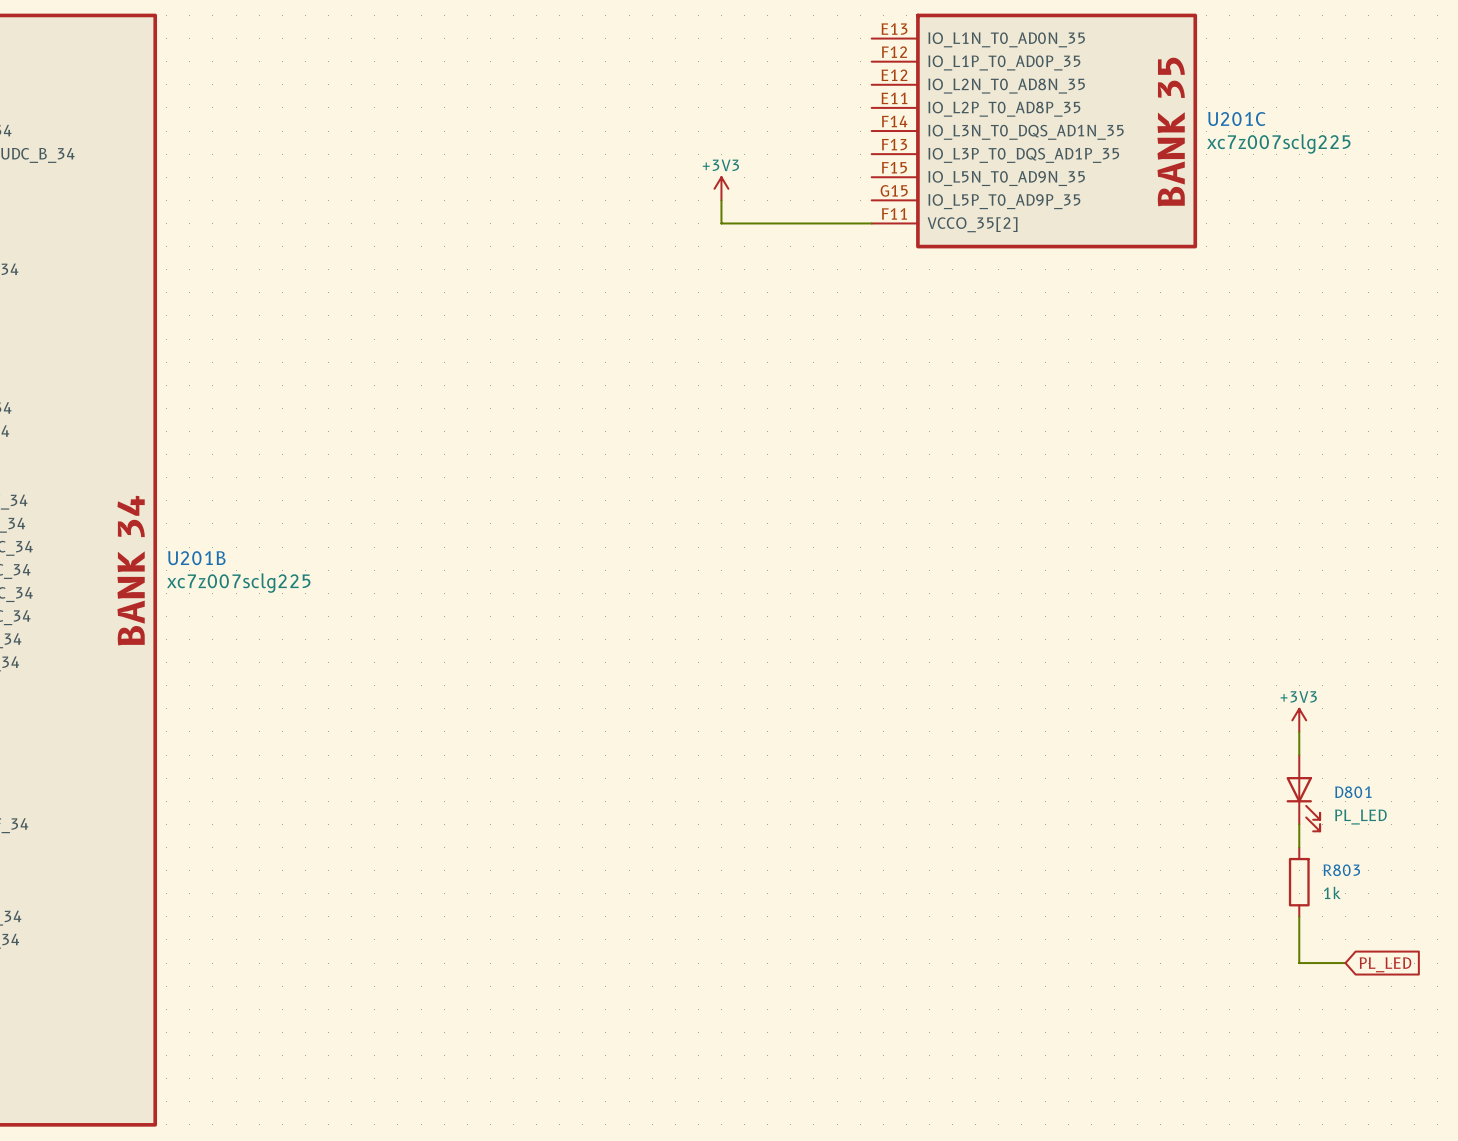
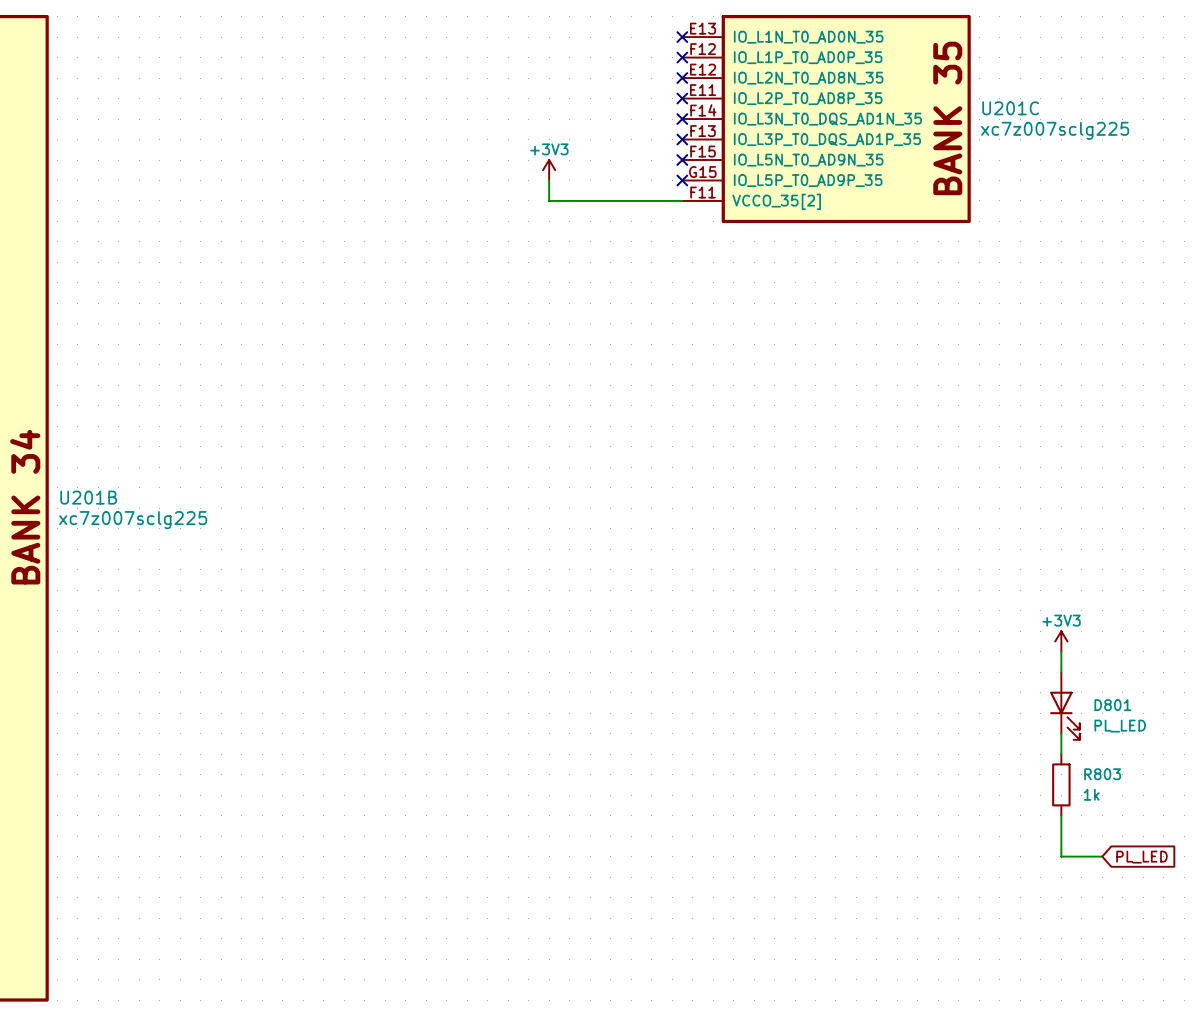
no-connect mark: none -> (682, 37)
no-connect mark: none -> (682, 57)
no-connect mark: none -> (682, 78)
no-connect mark: none -> (682, 98)
no-connect mark: none -> (682, 119)
no-connect mark: none -> (682, 139)
no-connect mark: none -> (682, 160)
no-connect mark: none -> (682, 180)

